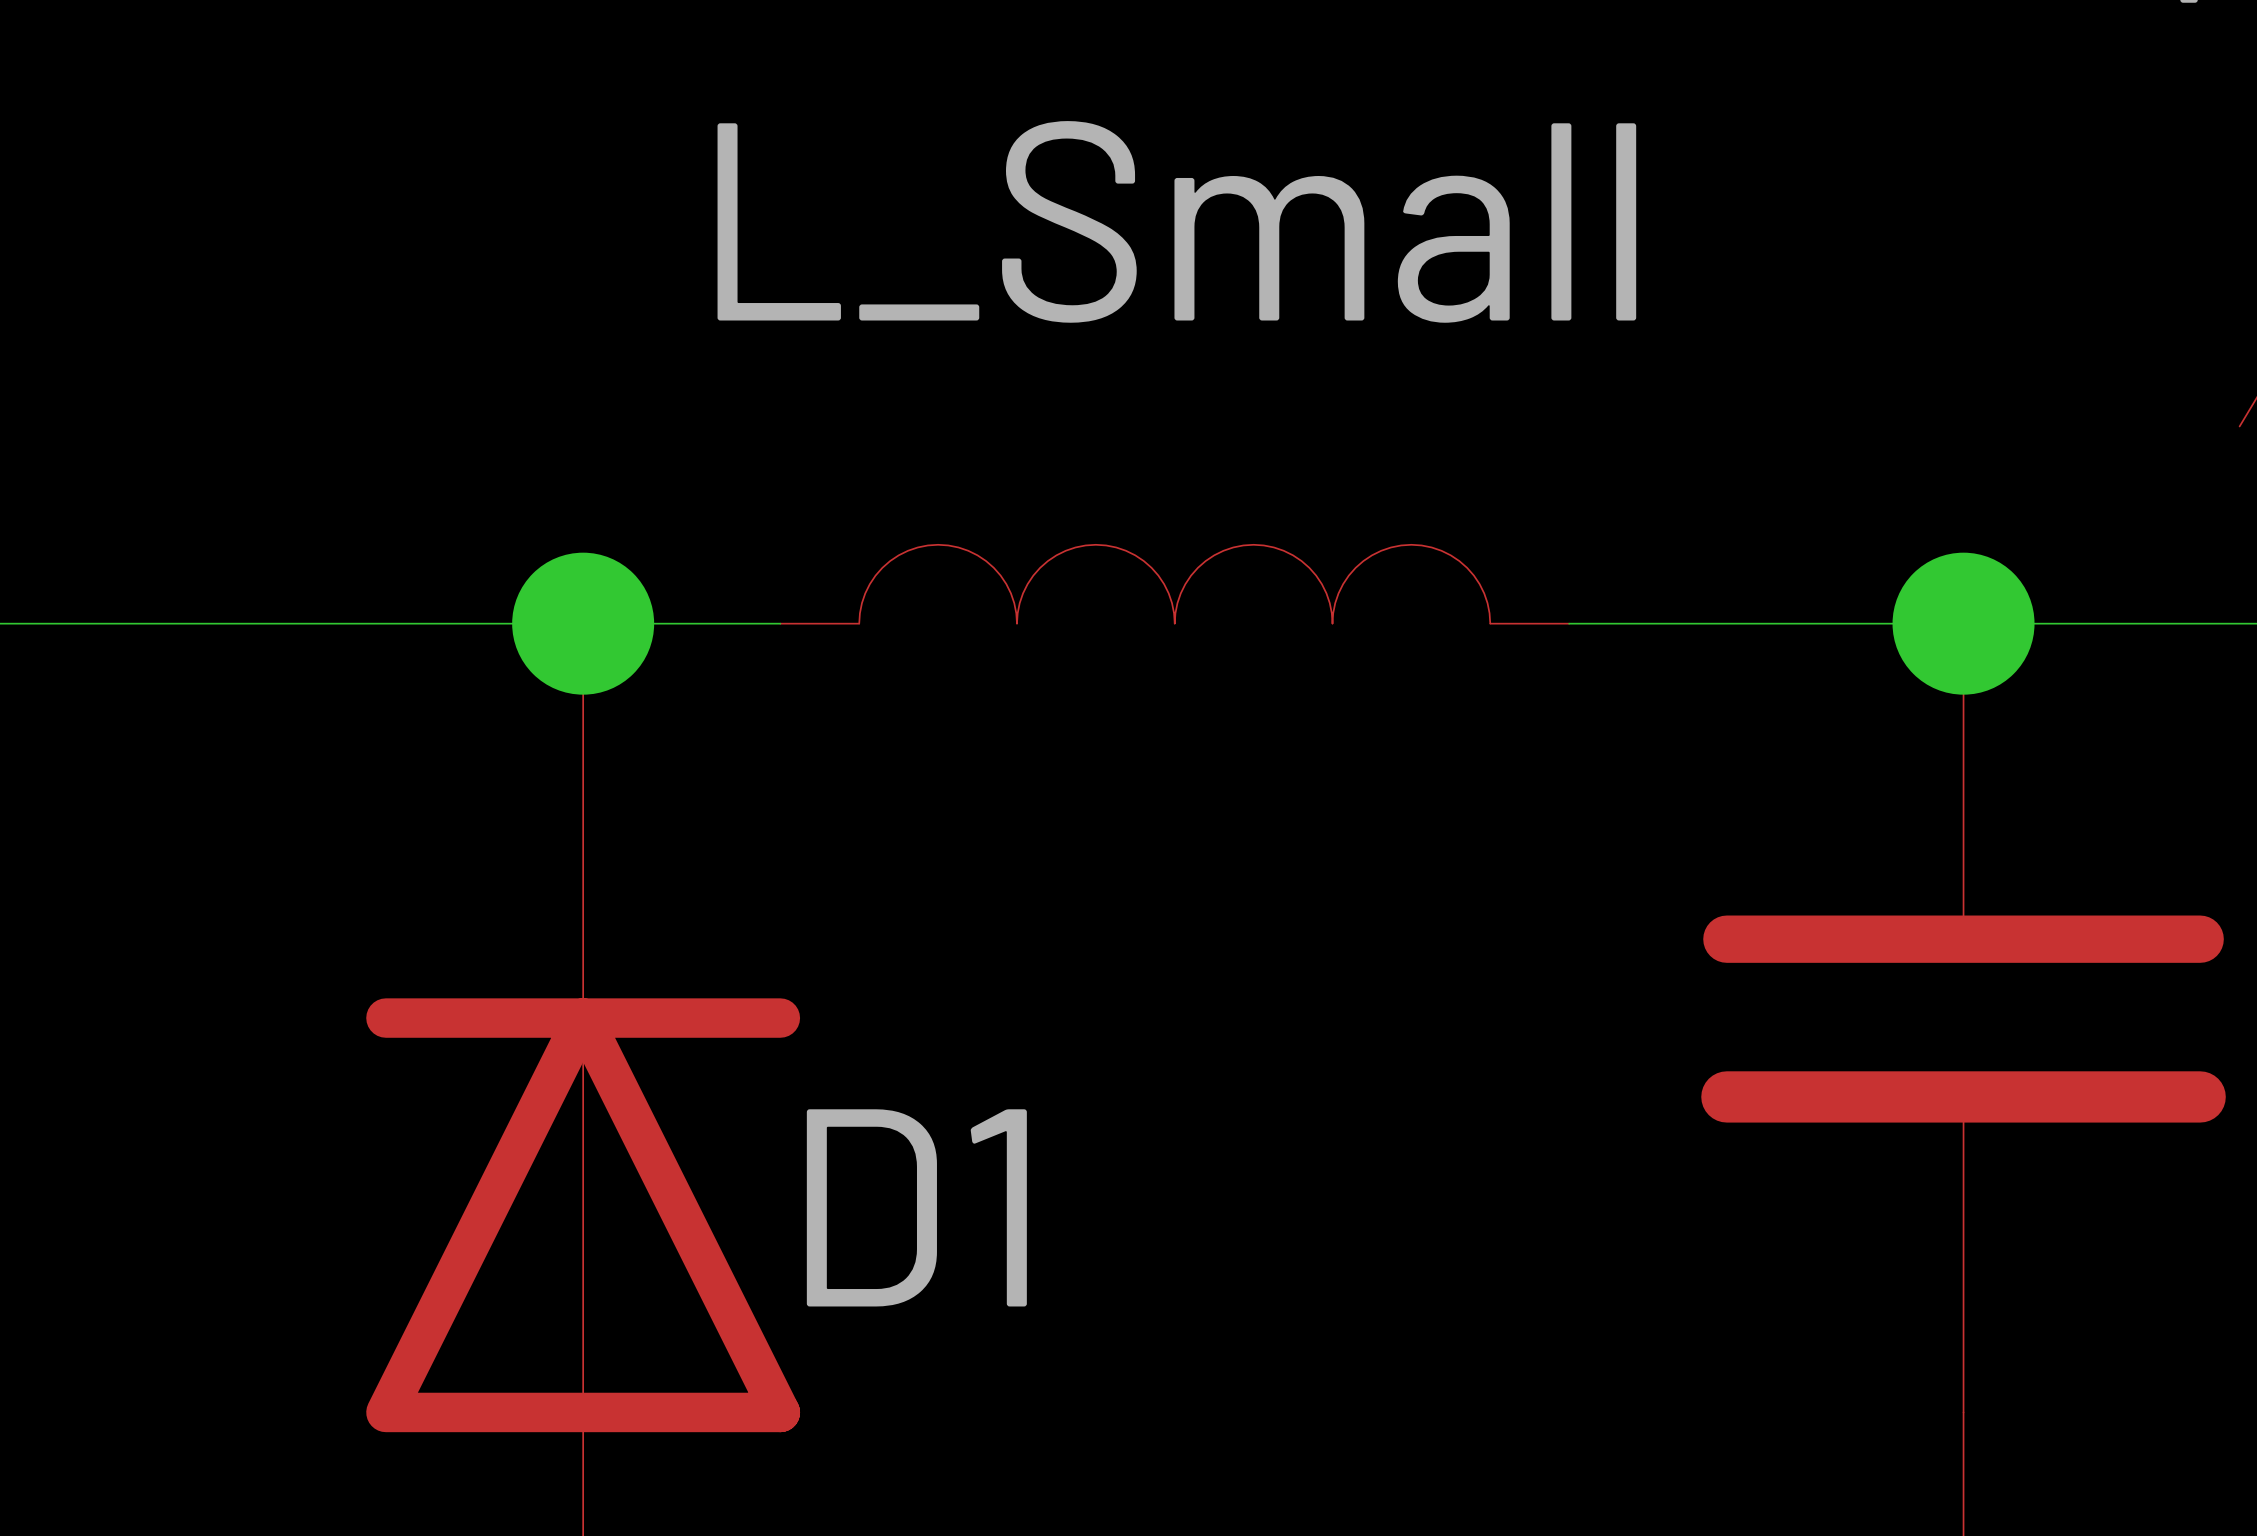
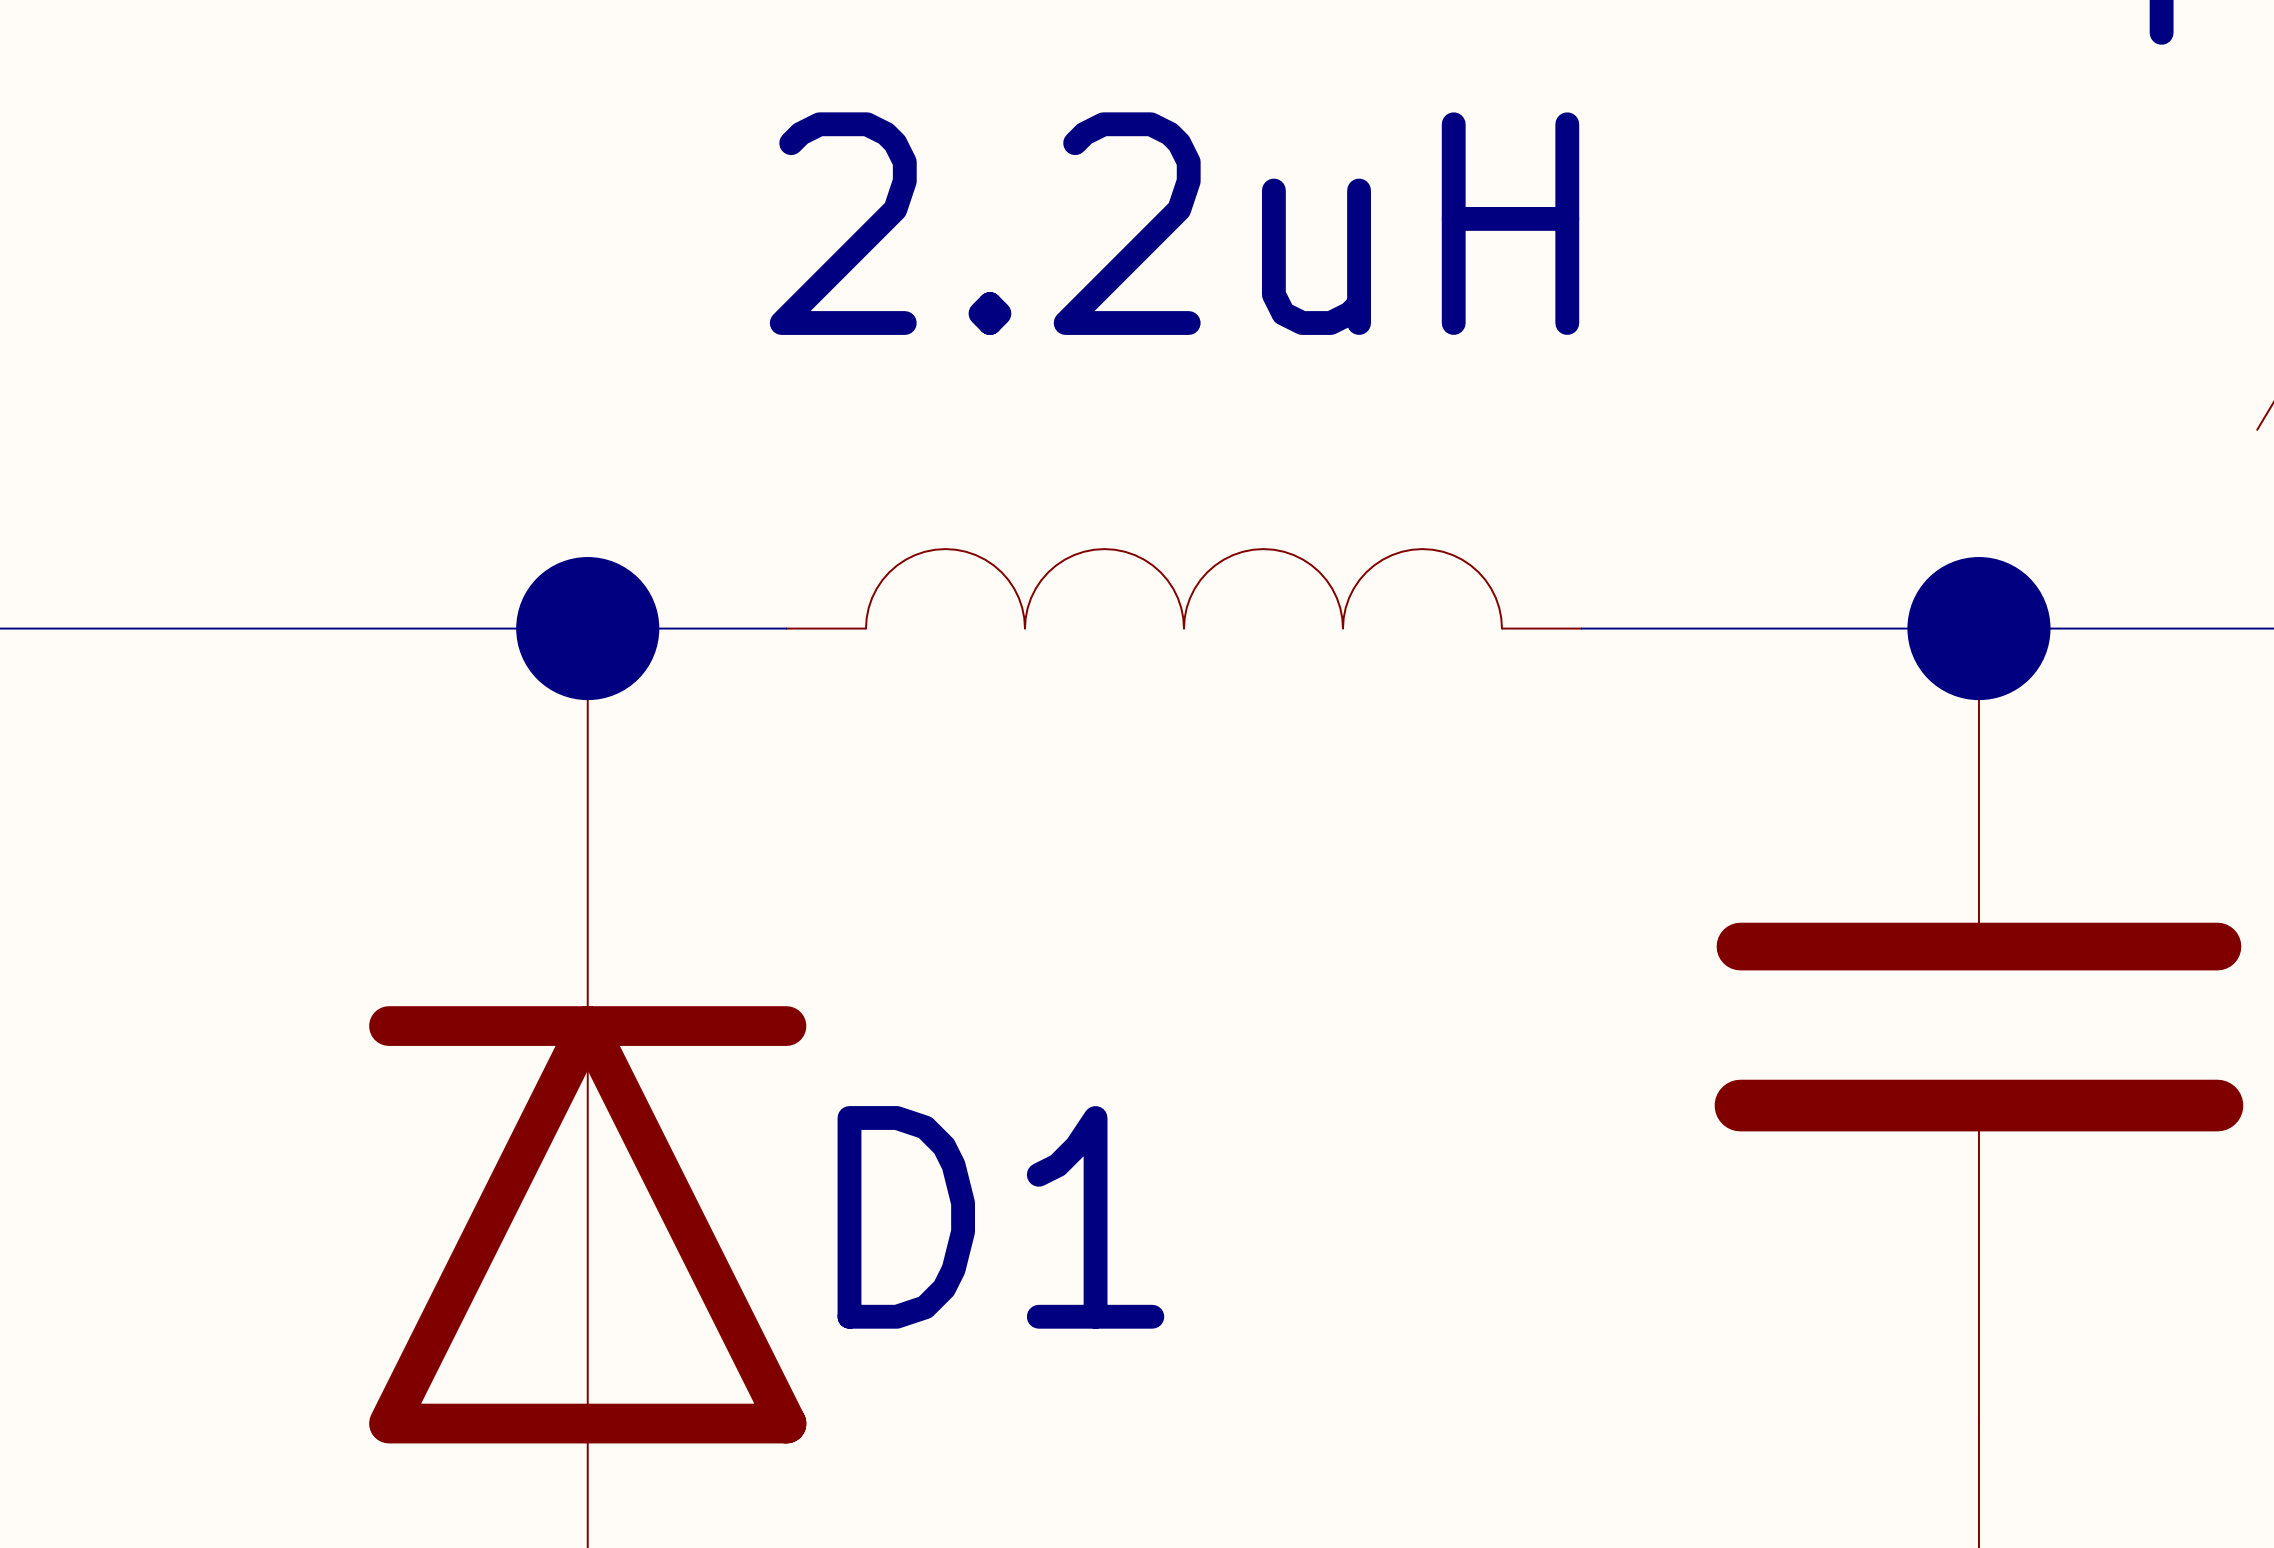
part value: L_Small (1176, 221) -> 2.2uH (1174, 223)

